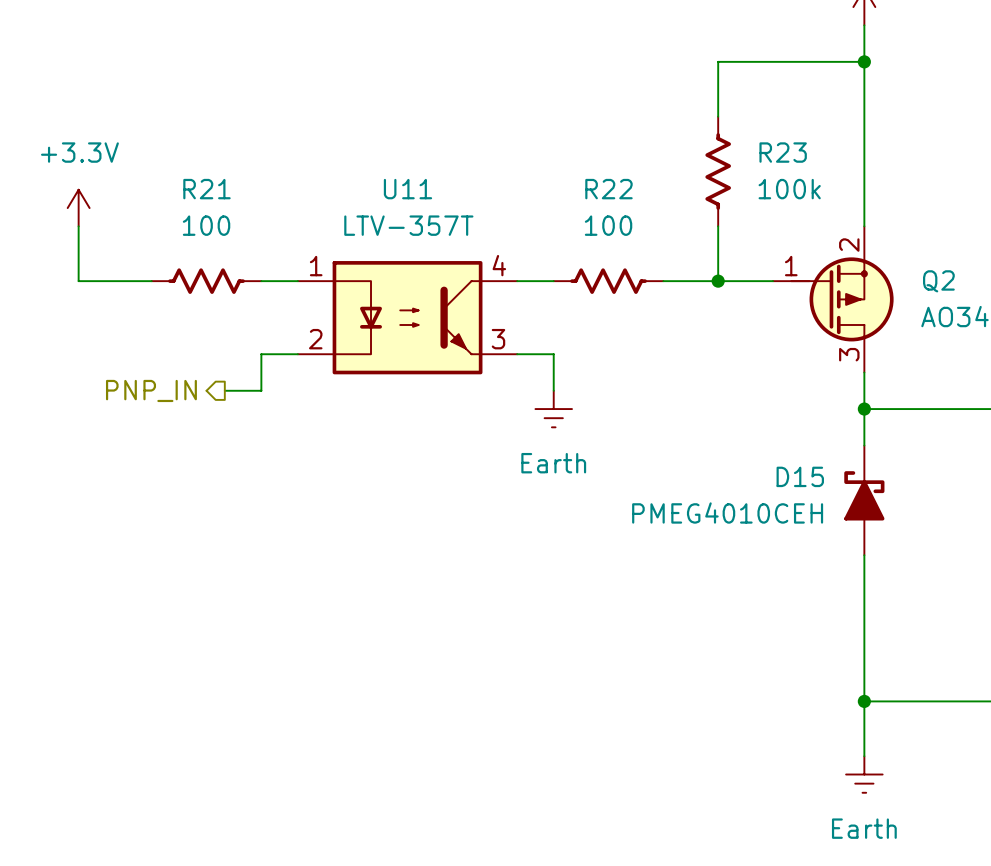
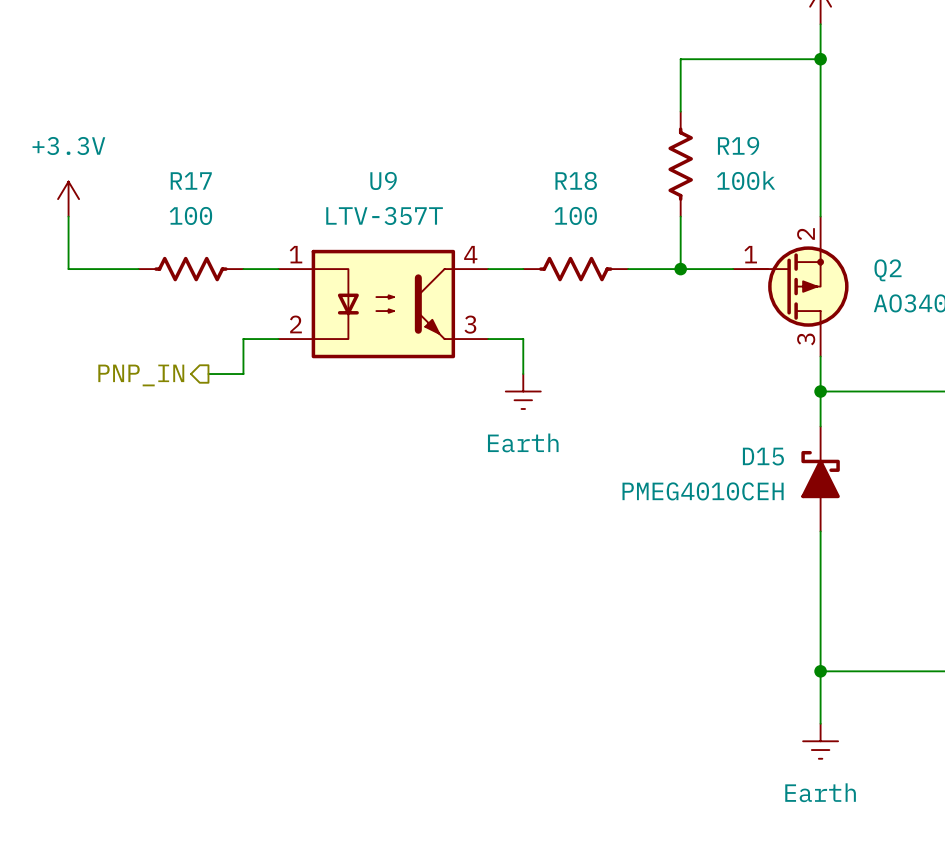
R23 name: R23 (783, 152) -> R19 (738, 145)
R21 name: R21 (206, 189) -> R17 (191, 180)
U11 name: U11 (407, 189) -> U9 (383, 180)
R22 name: R22 (608, 189) -> R18 (576, 180)

